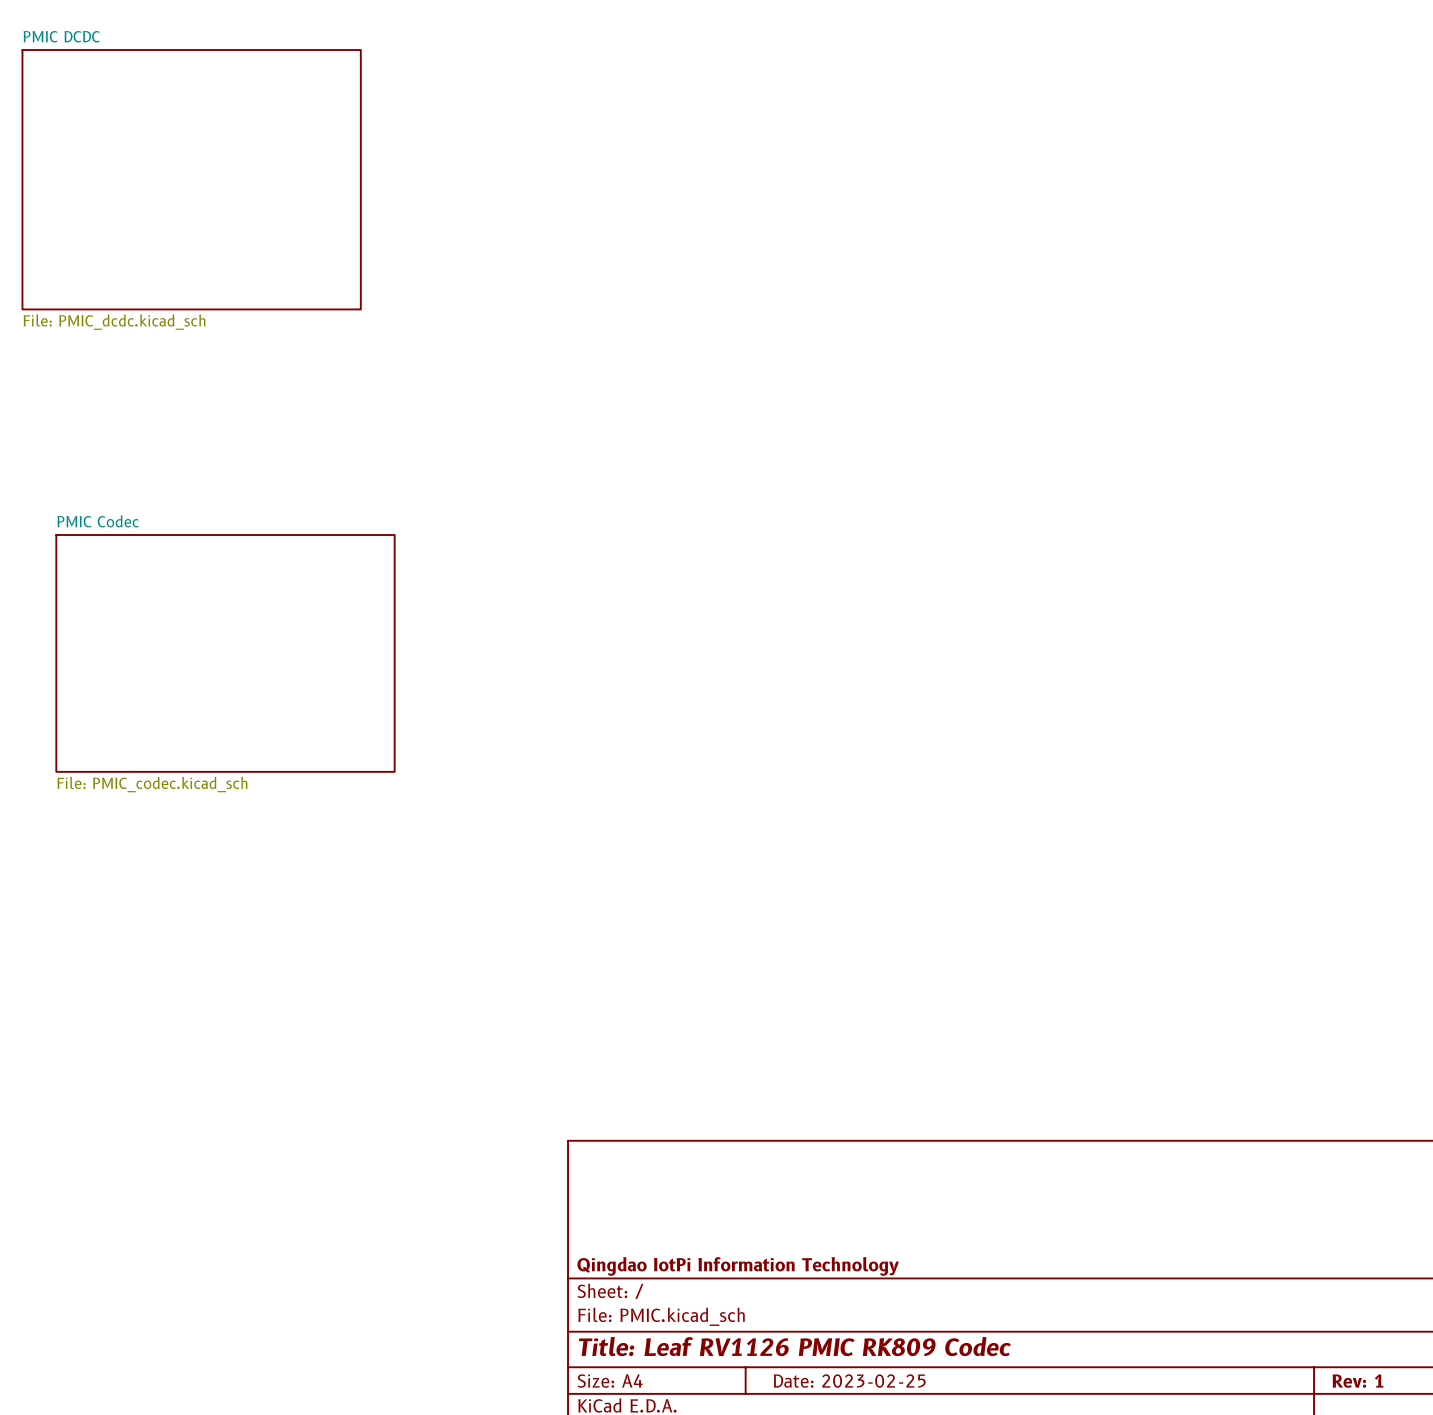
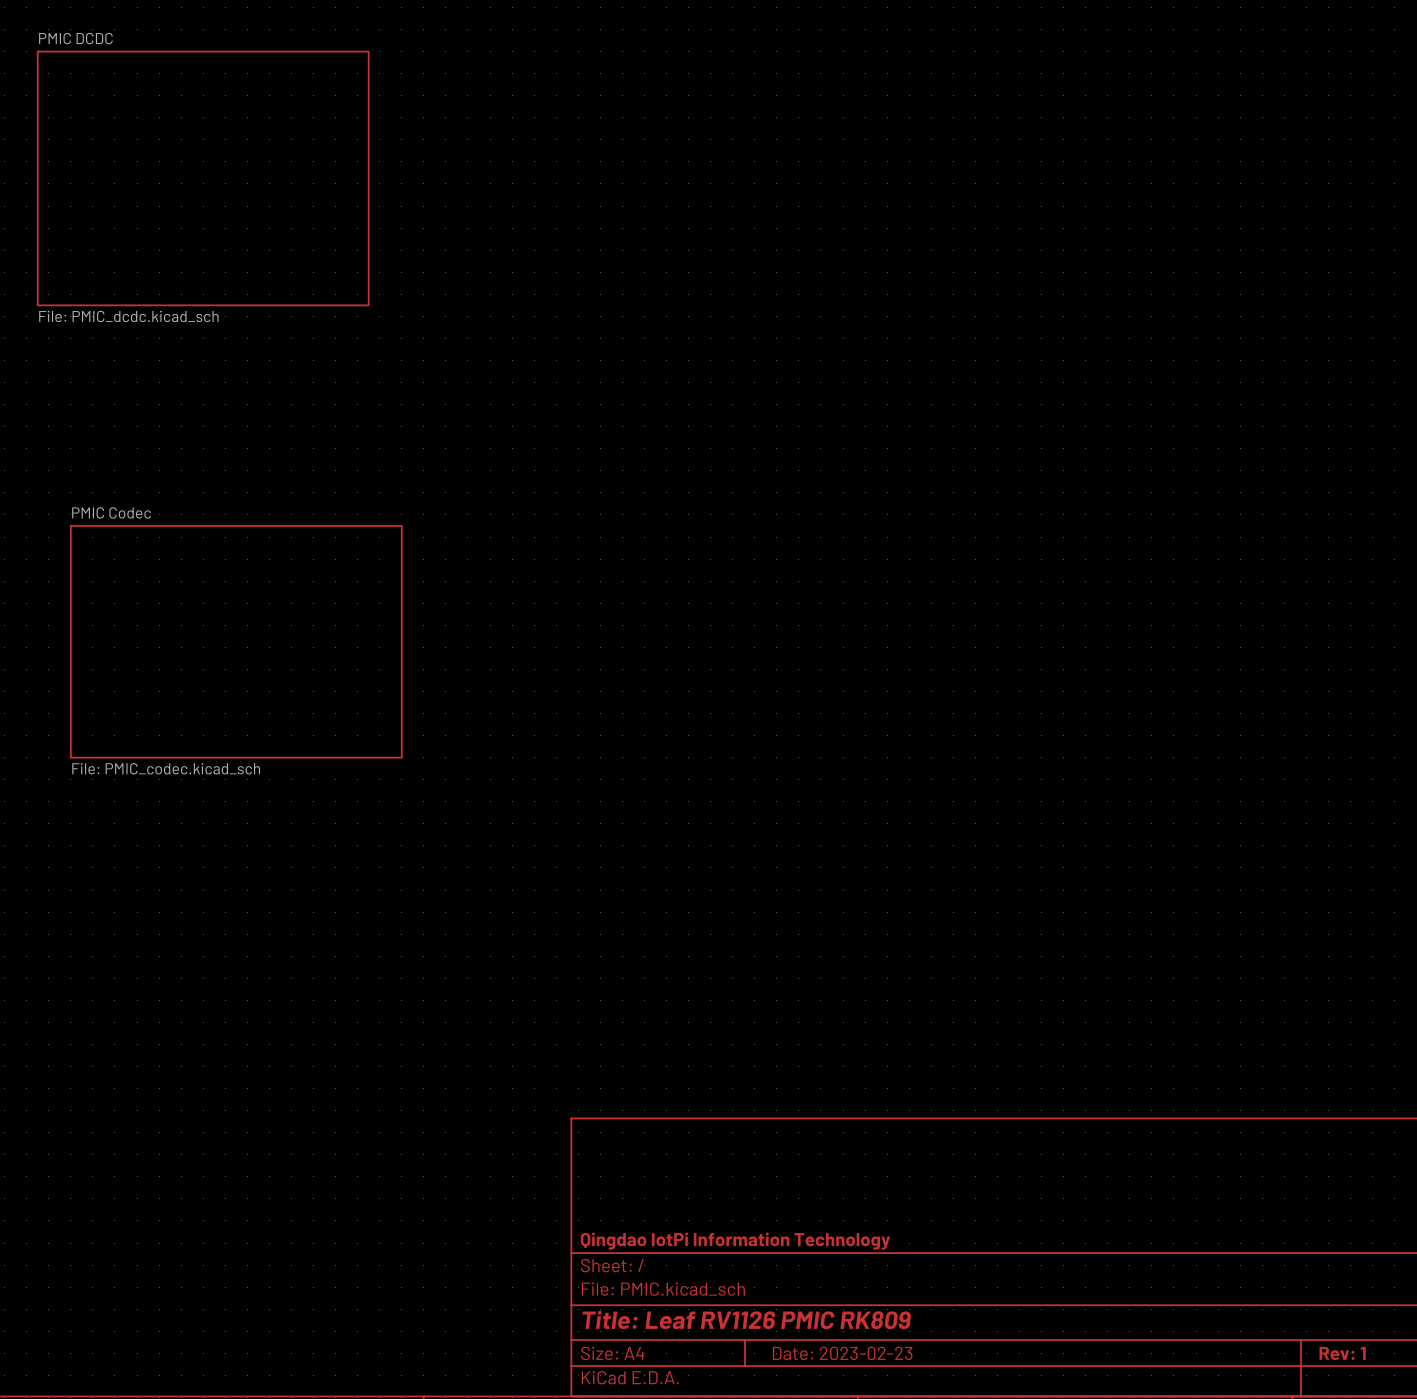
title block: Title: Leaf RV1126 PMIC RK809 Codec (794, 1346) -> Title: Leaf RV1126 PMIC RK809 (746, 1319)
title block: Date: 2023-02-25 (849, 1381) -> Date: 2023-02-23 (842, 1353)

